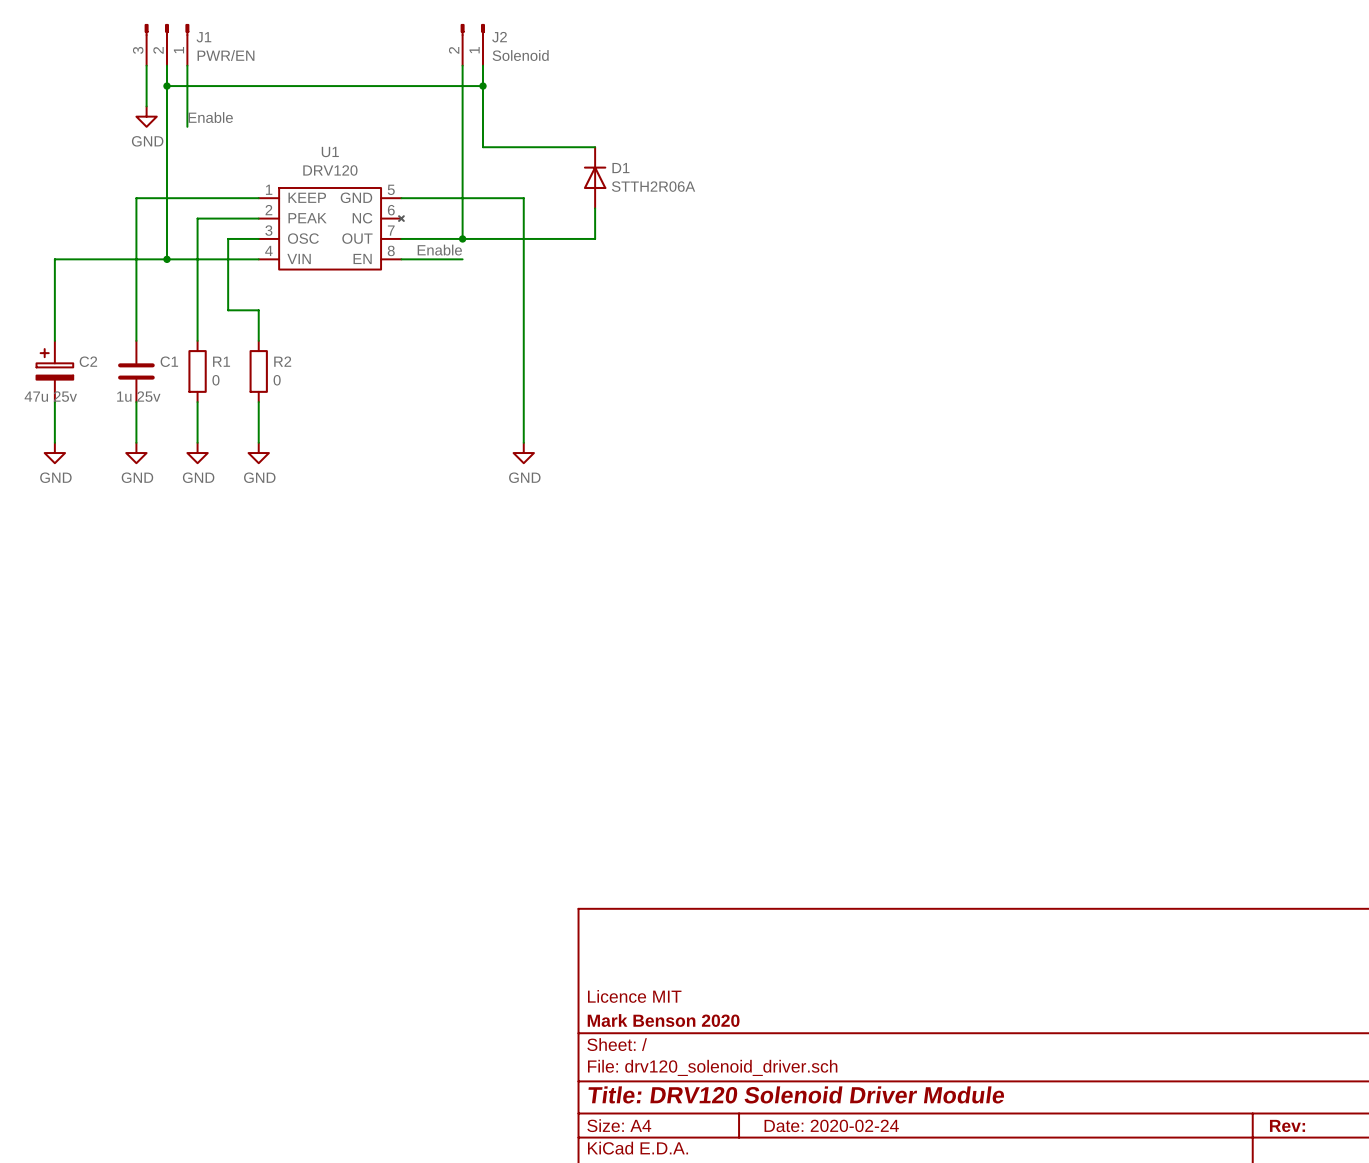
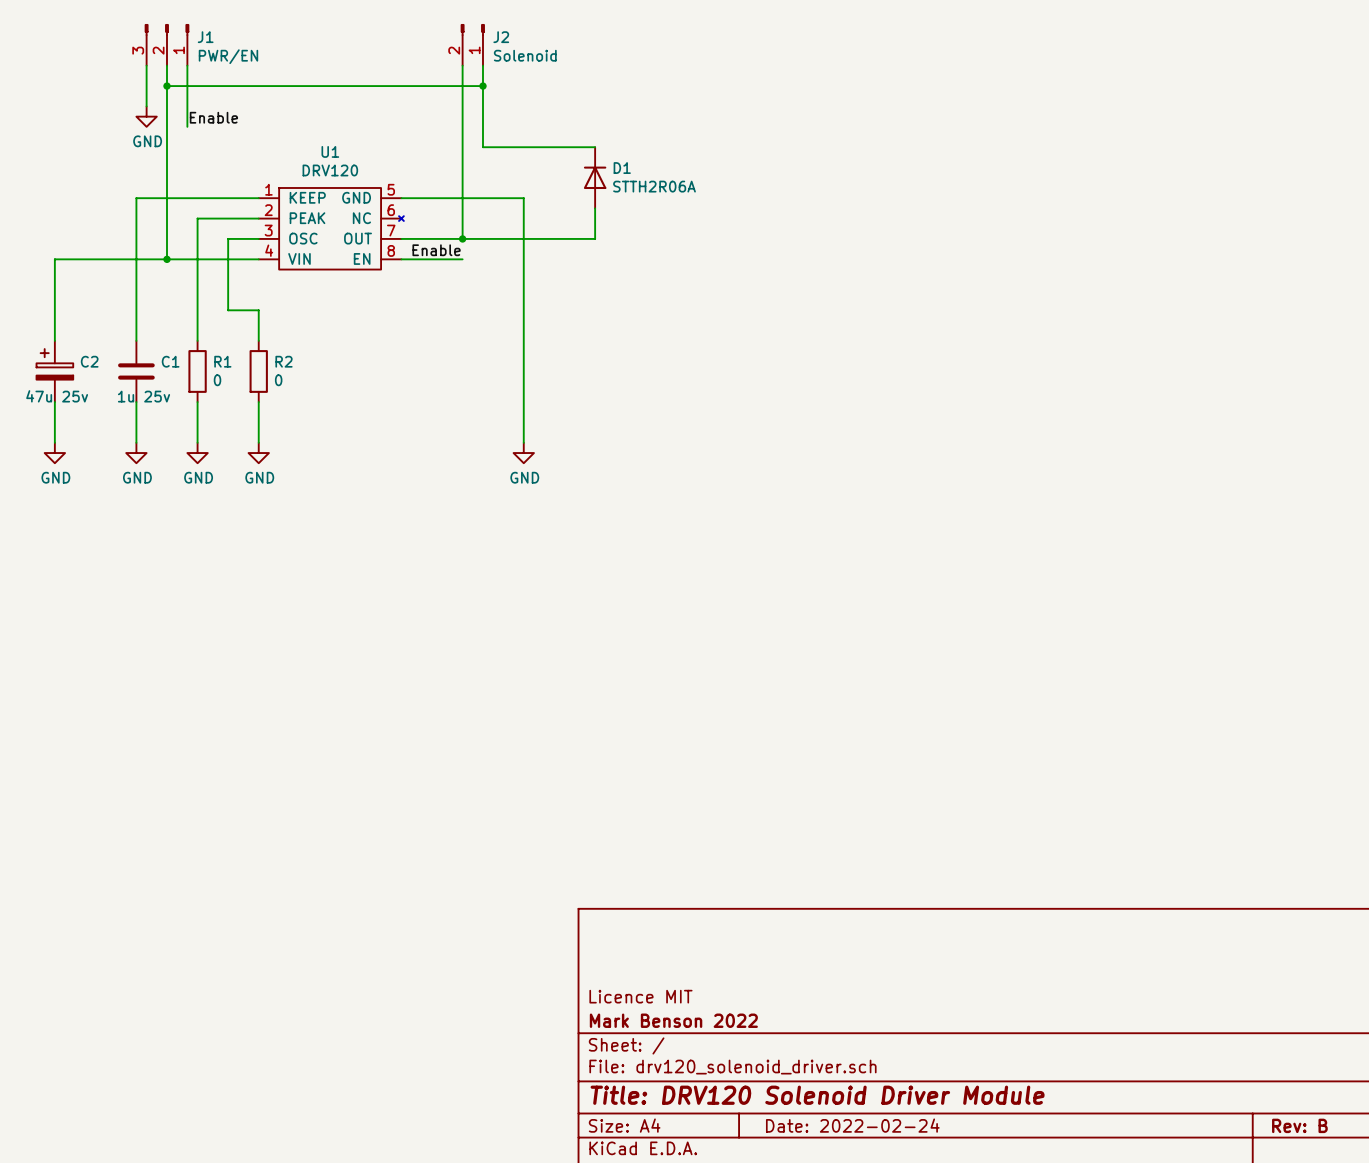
title block: Mark Benson 2020 (663, 1020) -> Mark Benson 2022 (673, 1020)
title block: Date: 2020-02-24 (831, 1125) -> Date: 2022-02-24 (852, 1125)
title block: Rev: (1287, 1125) -> Rev: B (1299, 1125)

